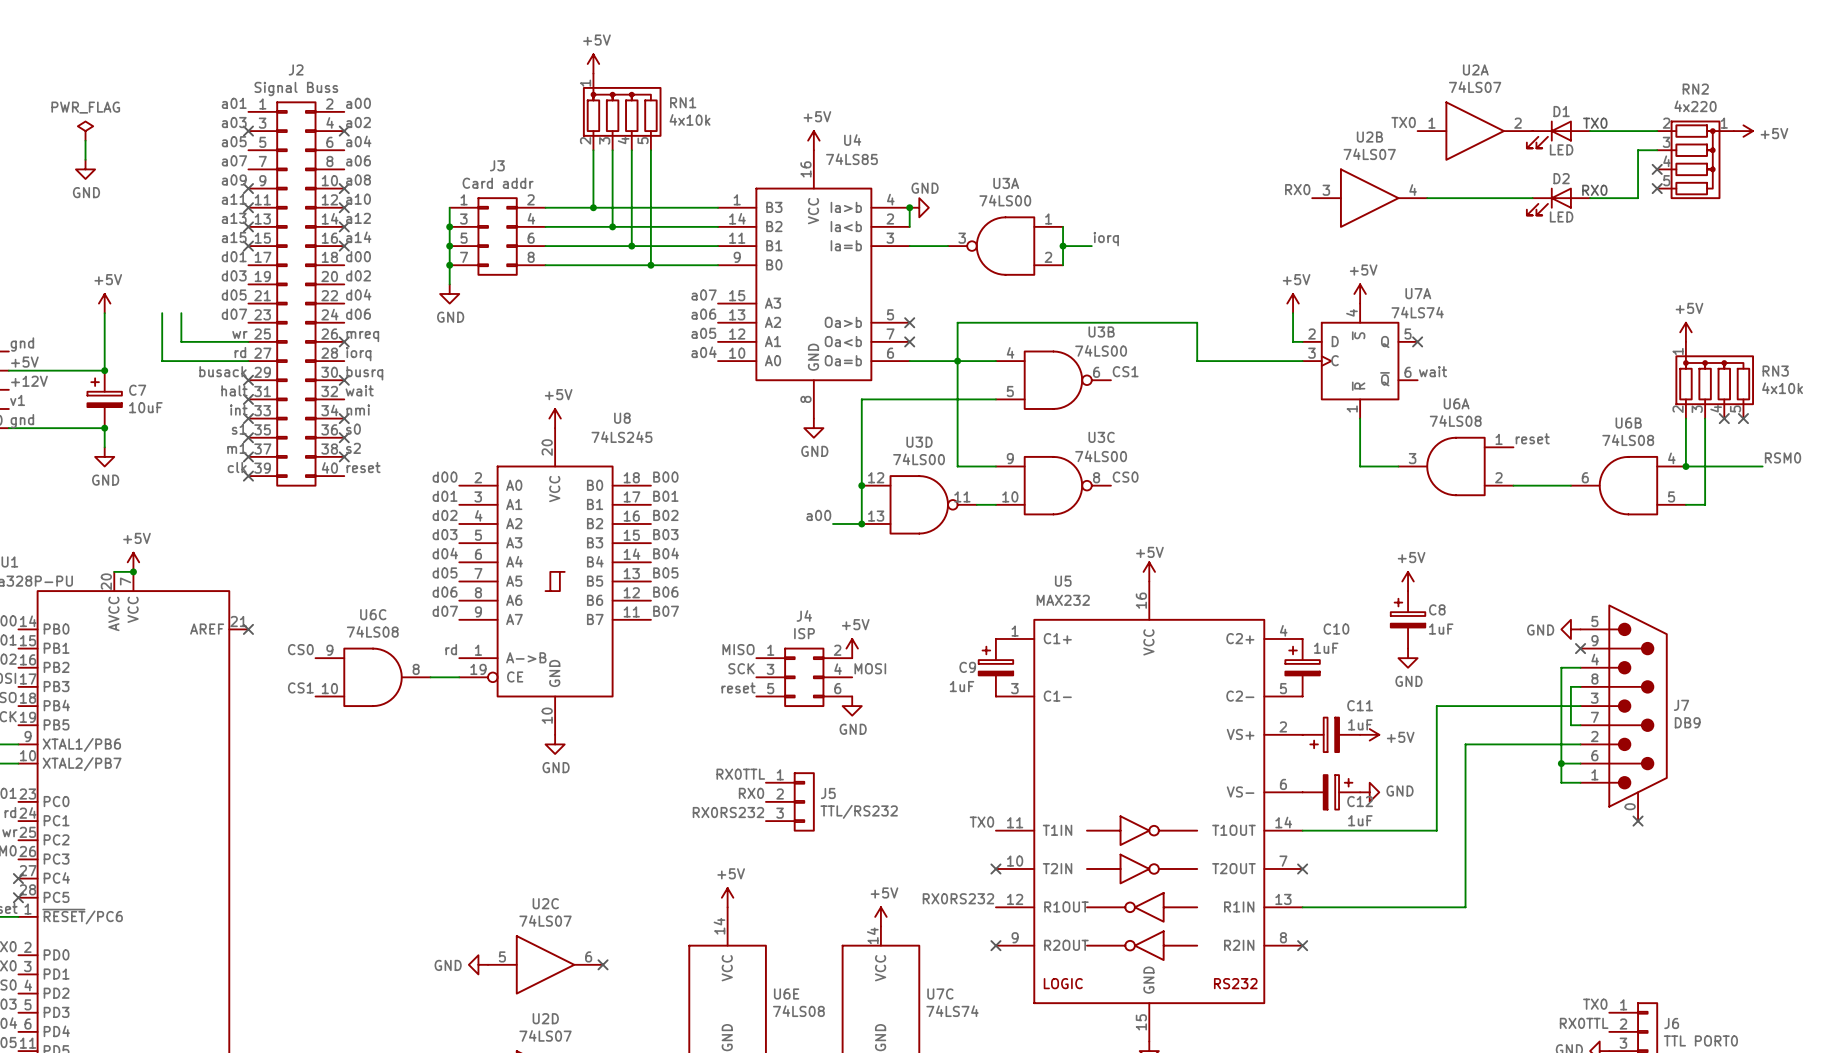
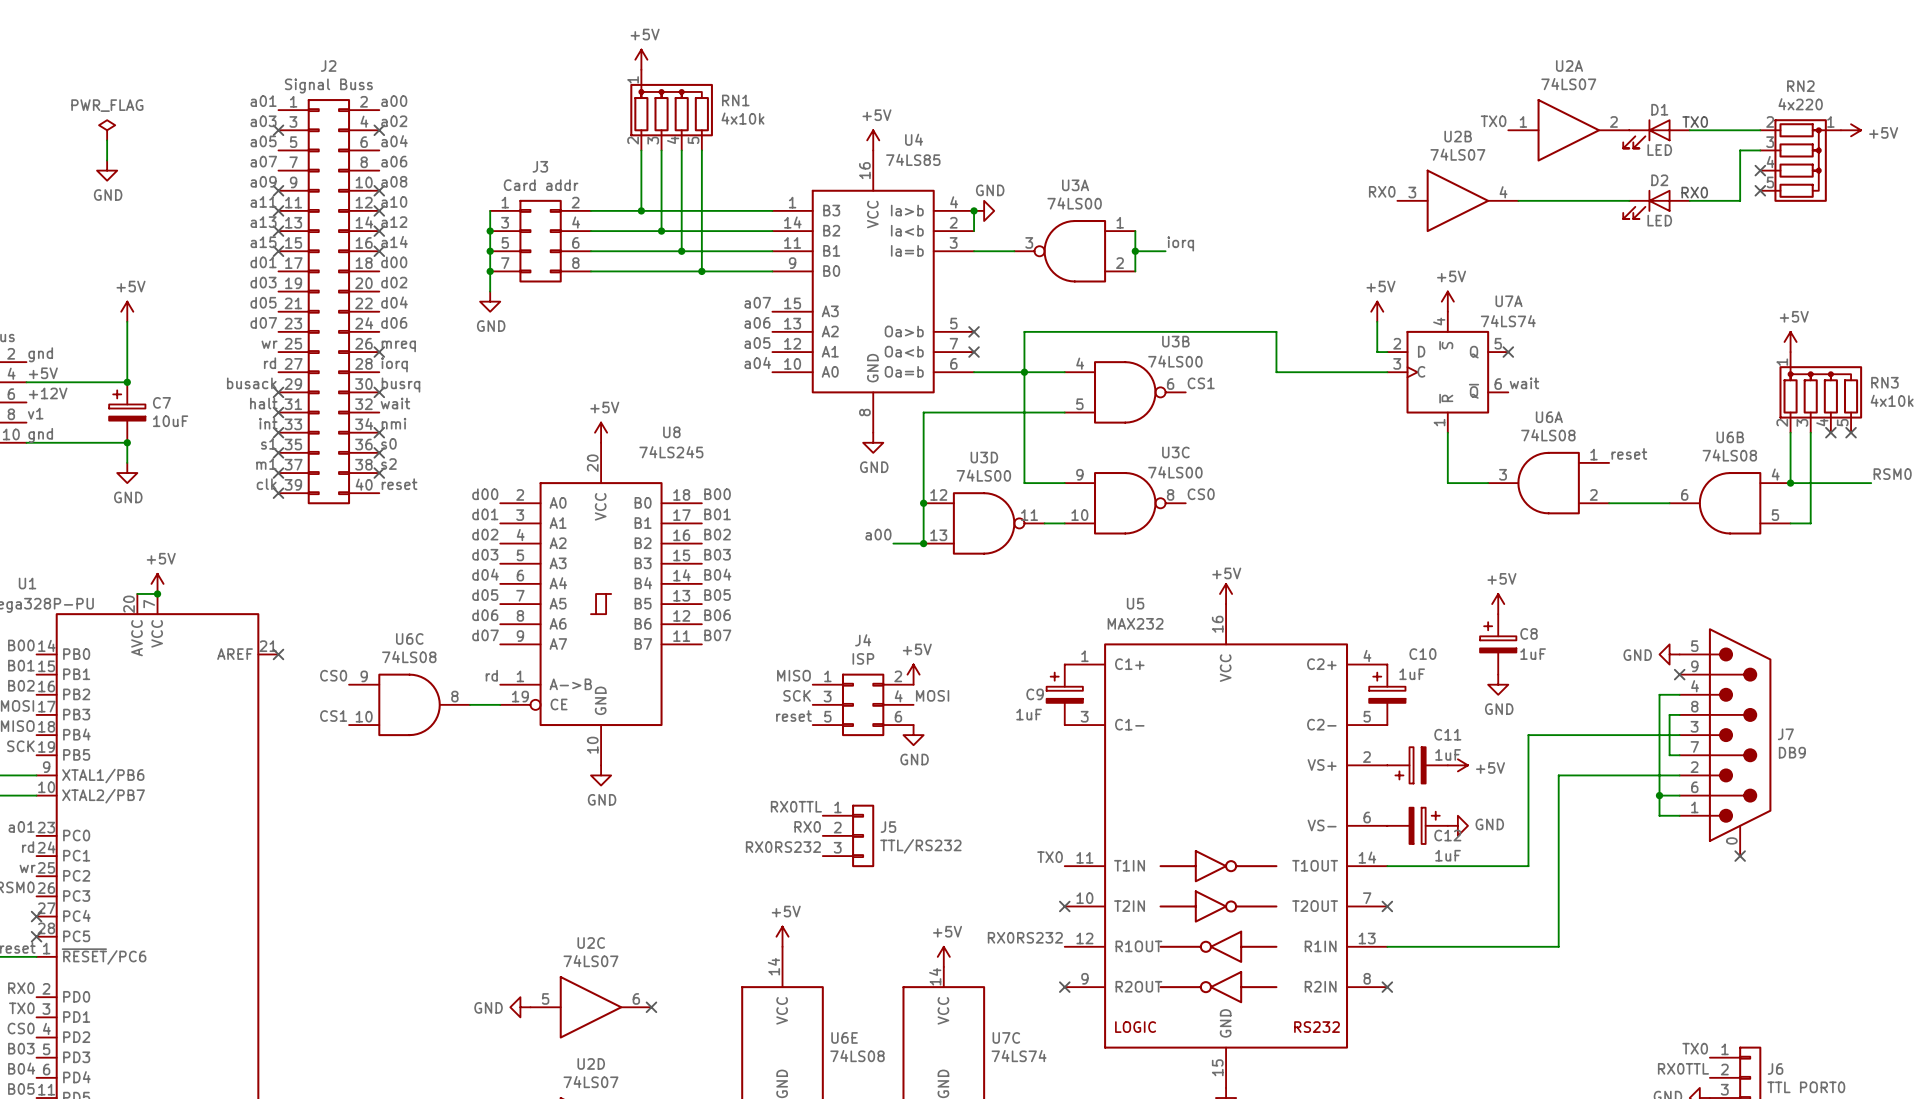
wire: (162, 313) (162, 361) (248, 361) -> none
wire: (181, 313) (181, 341) (248, 341) -> none

